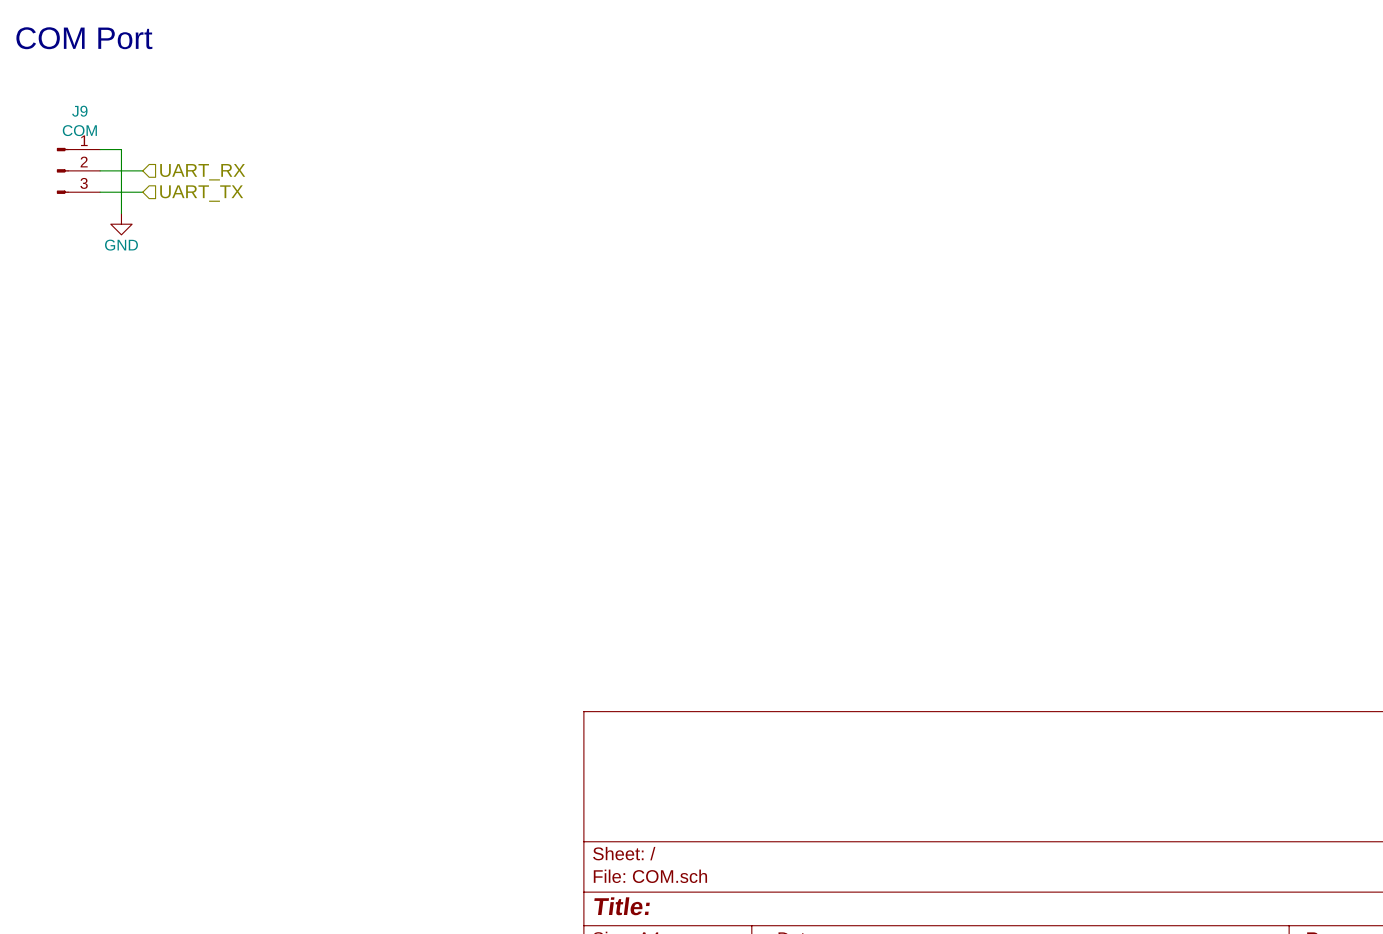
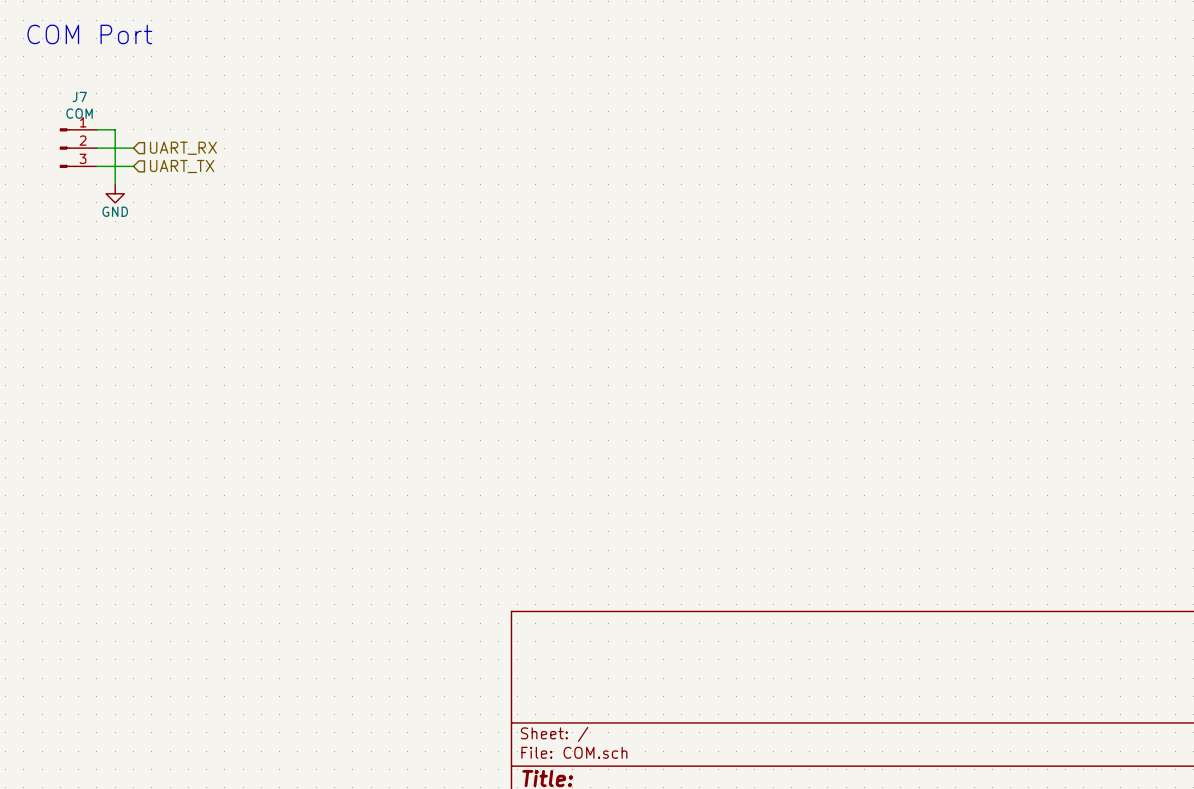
J9 name: J9 (79, 111) -> J7 (79, 96)

